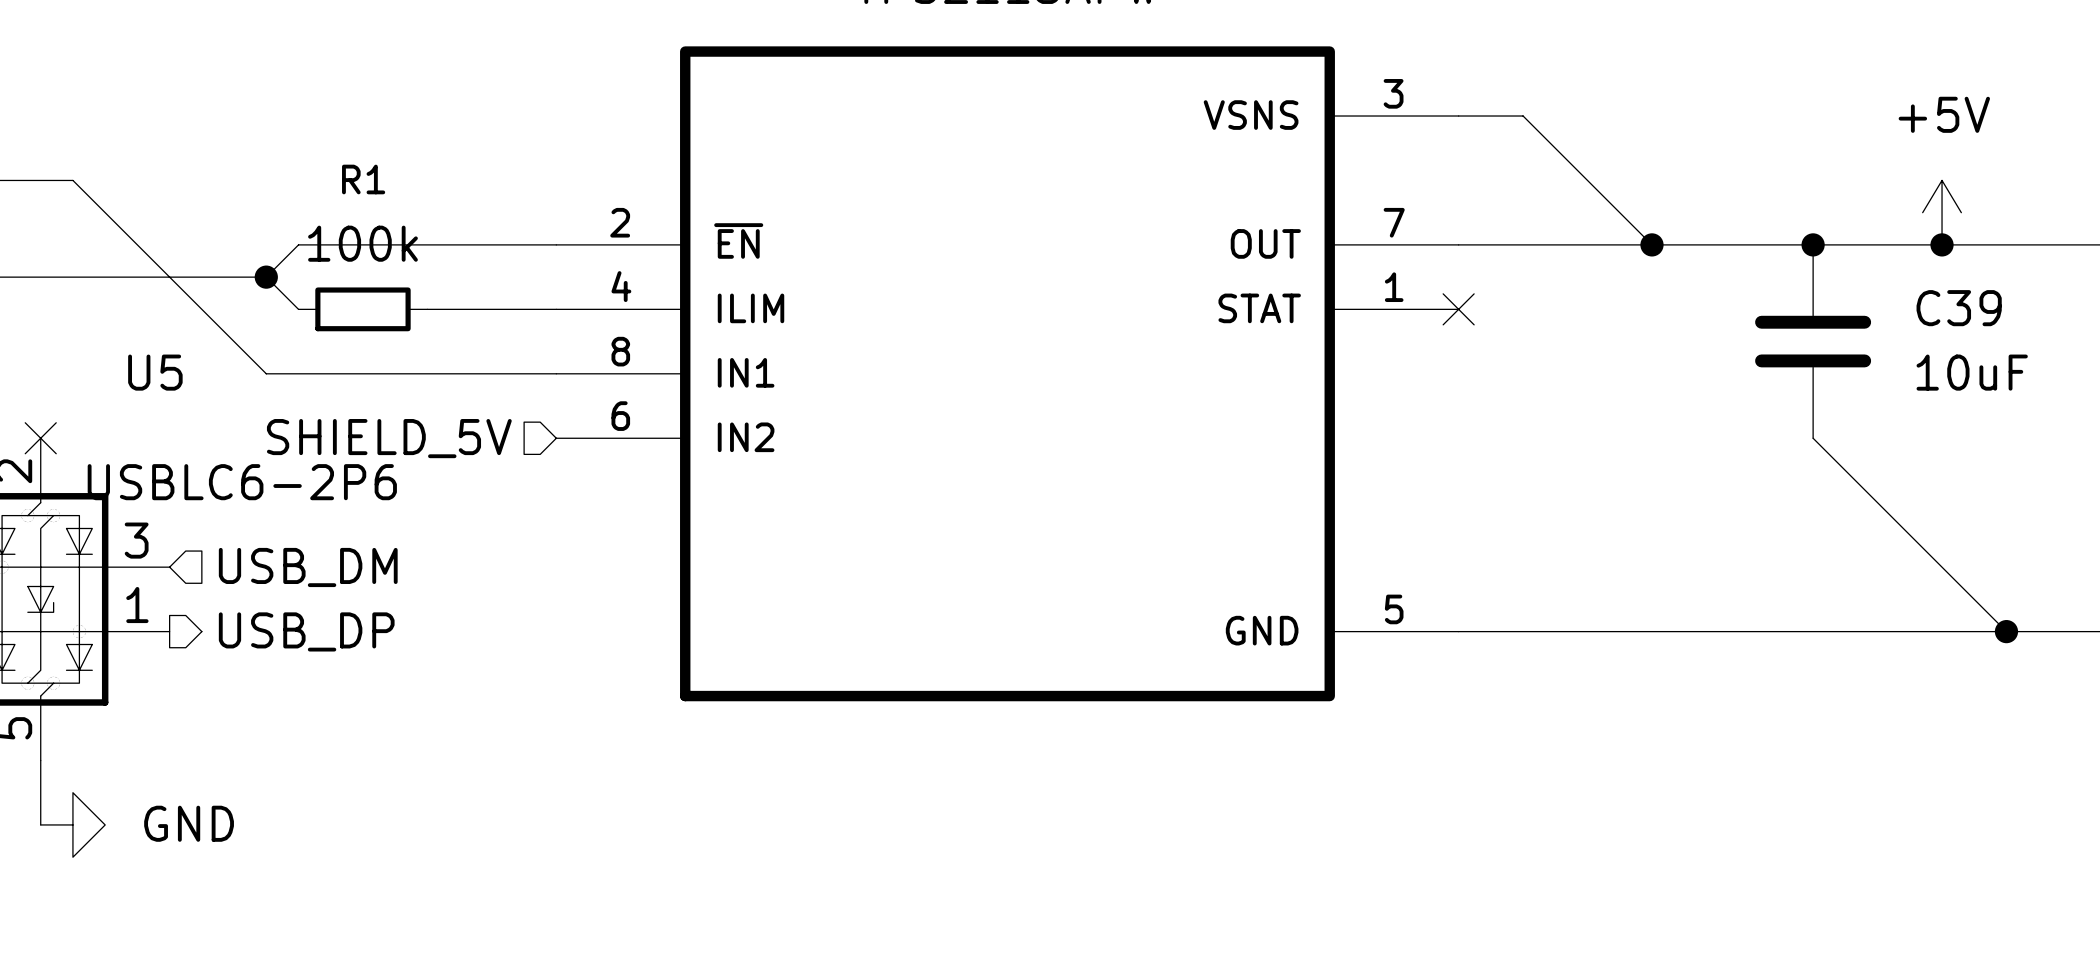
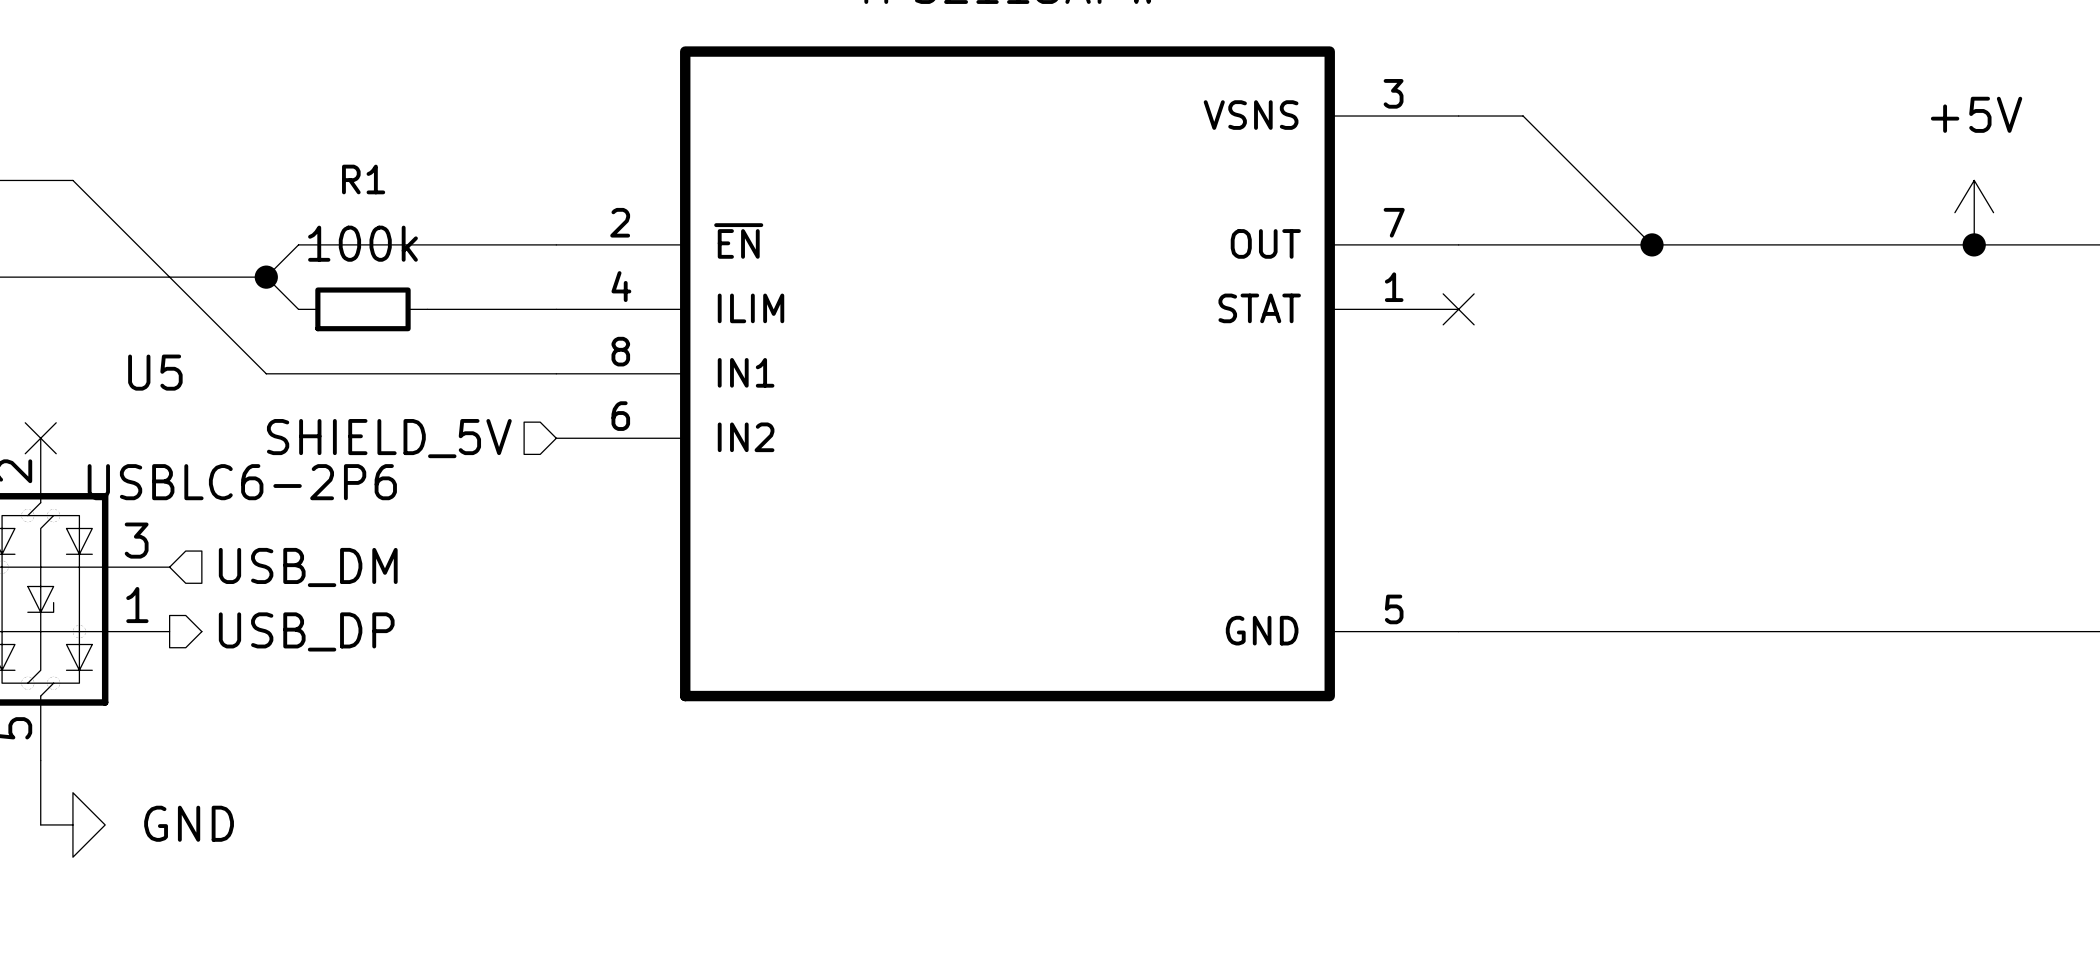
power symbol position: +5V (1942, 212) -> +5V (1974, 212)
junction: (1813, 244) -> none
junction position: (1942, 244) -> (1974, 244)
C39: 10uF (1813, 341) -> none
wire: (1813, 438) (2006, 631) -> none
junction: (2006, 631) -> none

